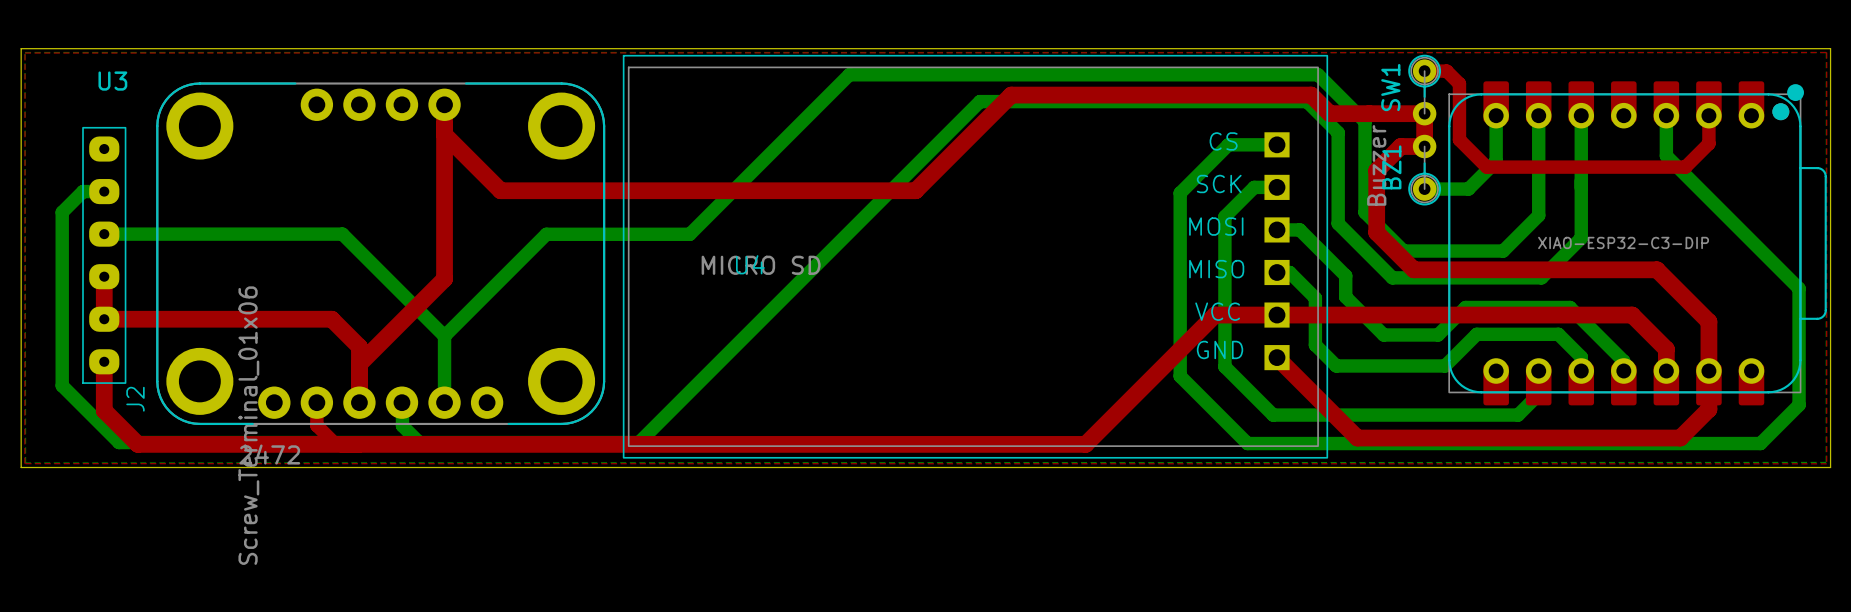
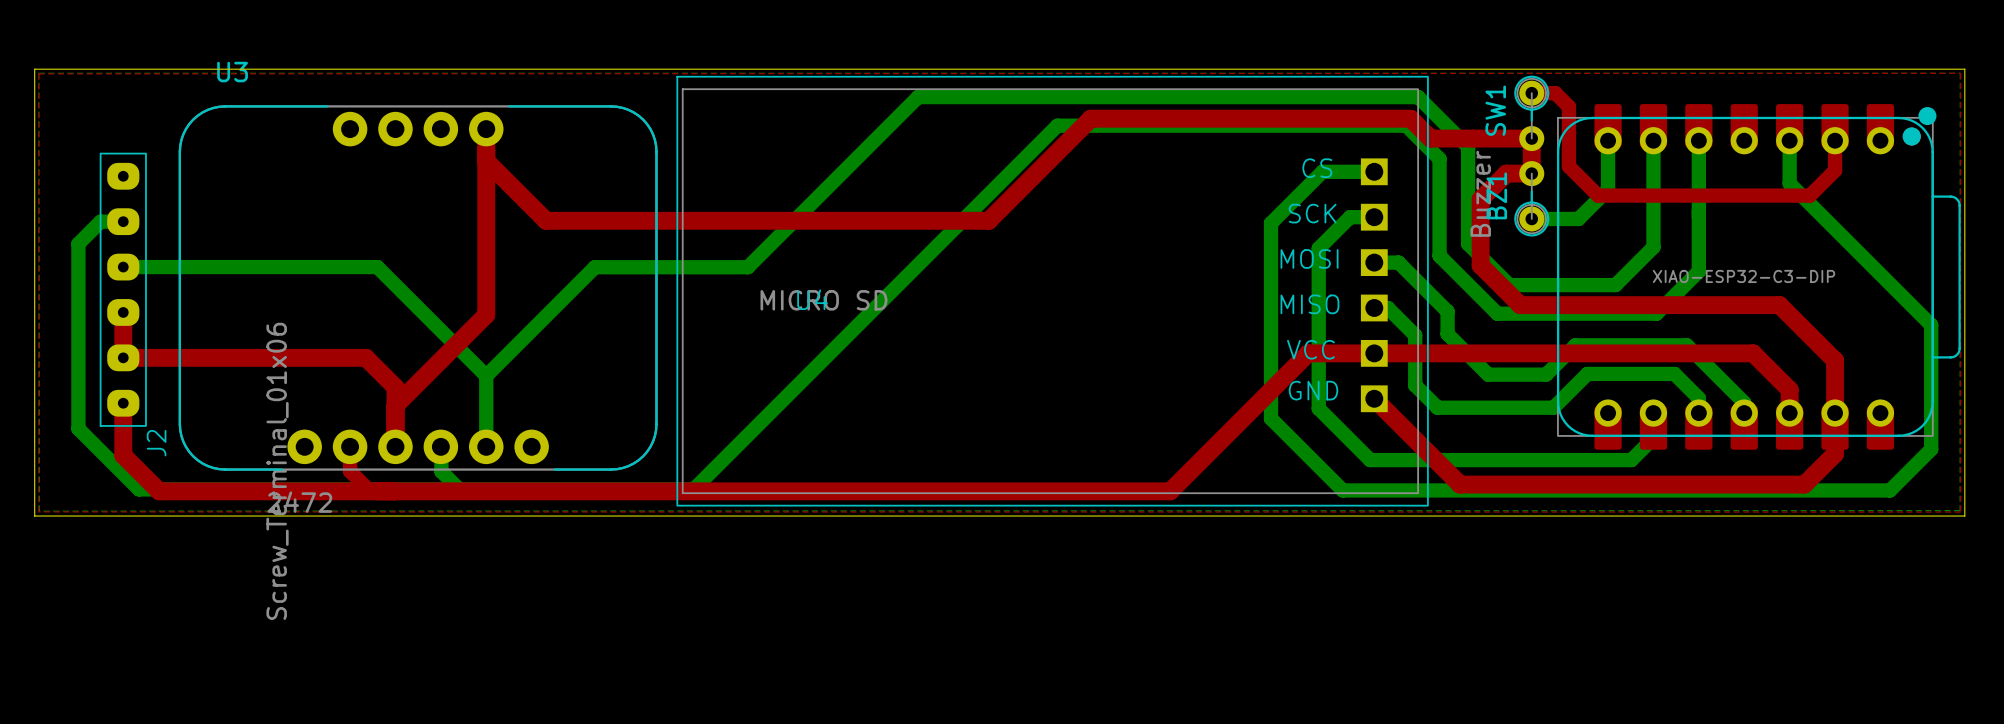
U3 name position: U3 (112, 81) -> U3 (232, 72)
U3 footprint: [156, 82, 606, 426] -> [178, 105, 658, 471]

